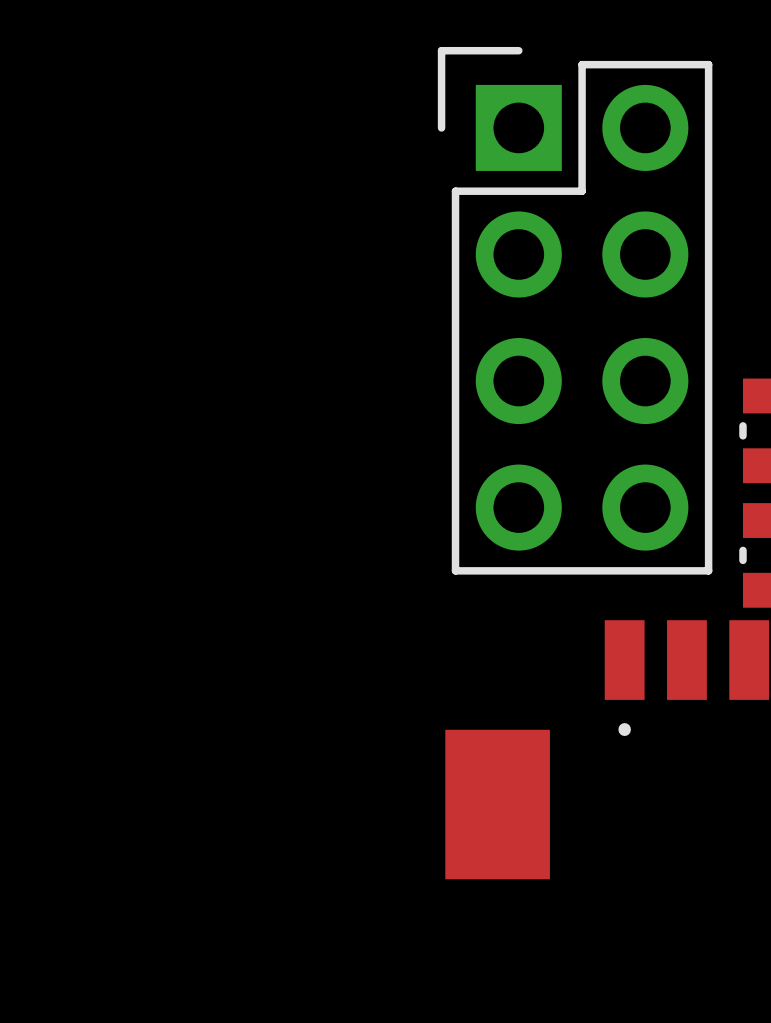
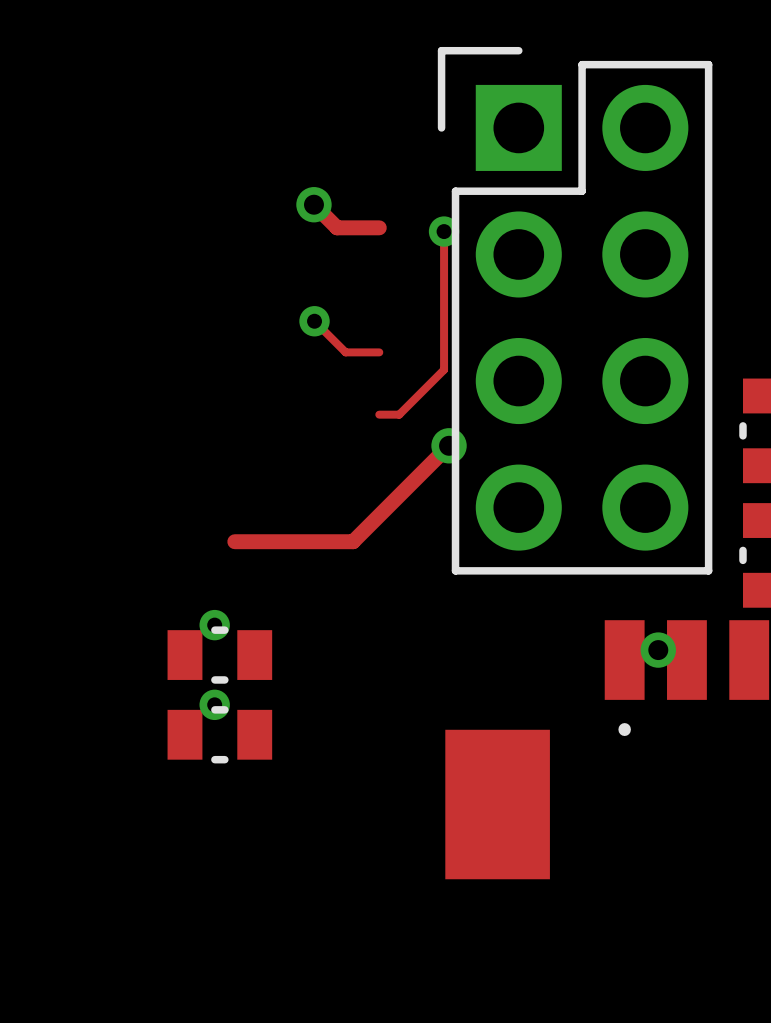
track: none -> (313, 204) (337, 227) (379, 227)
via: none -> (313, 204)
track: none -> (444, 231) (444, 369) (399, 414) (379, 414)
via: none -> (444, 231)
track: none -> (314, 321) (345, 352) (379, 352)
via: none -> (314, 321)
track: none -> (449, 445) (353, 541) (234, 541)
via: none -> (449, 445)
via: none -> (214, 625)
via: none -> (658, 650)
part: none -> (219, 655)
via: none -> (214, 704)
part: none -> (219, 734)

